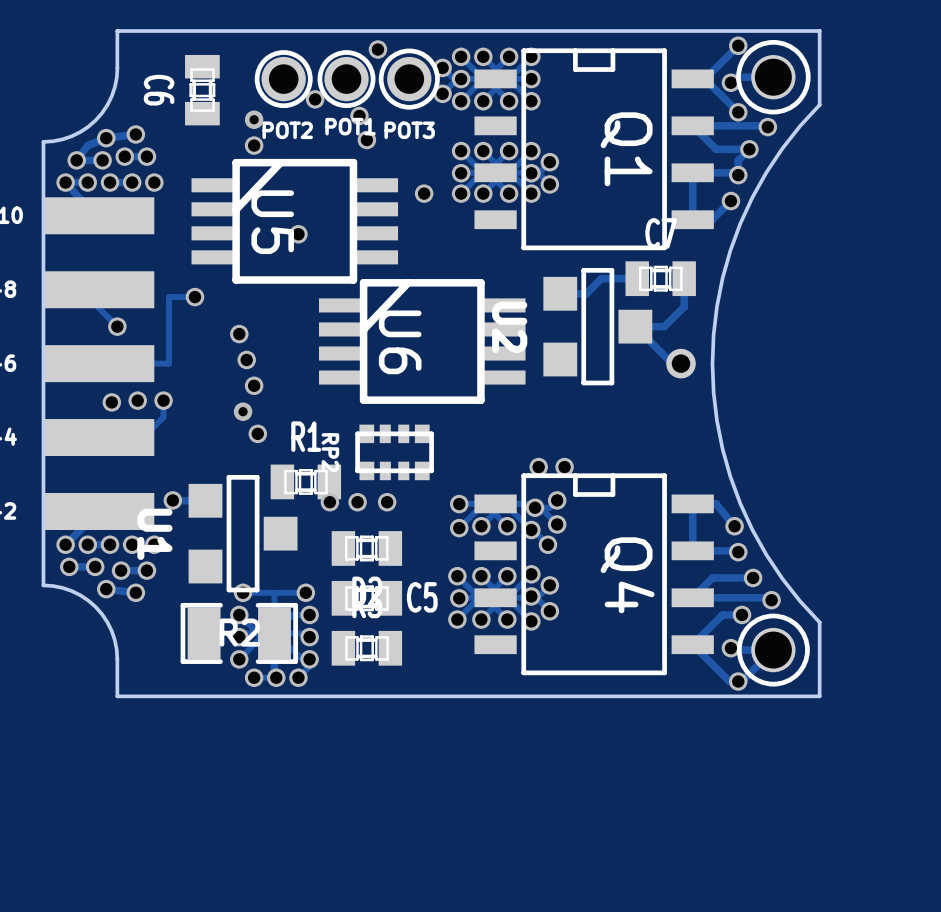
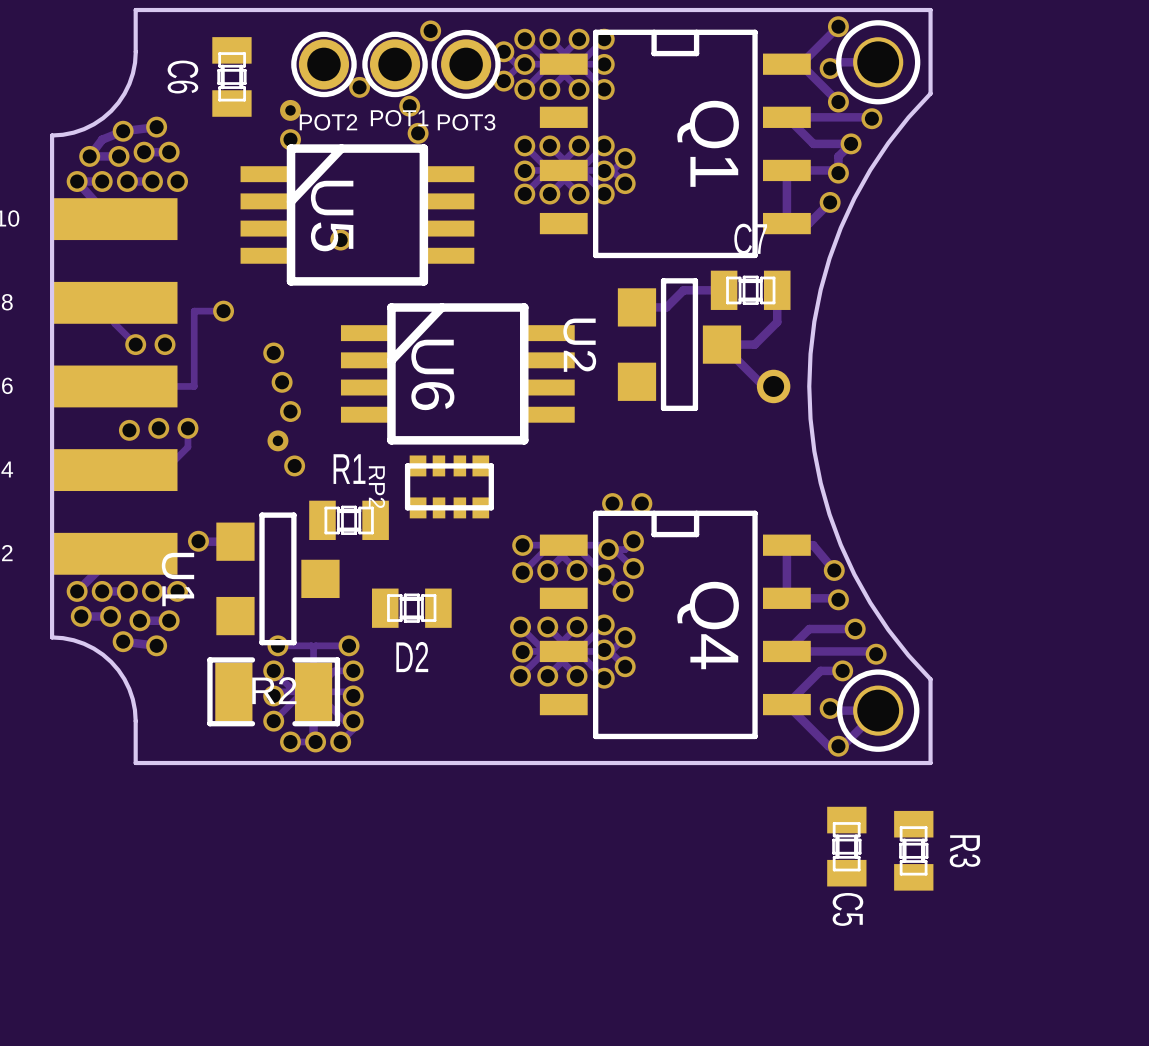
via: (424, 193) -> none
U5 position: (294, 221) -> (357, 214)
via: none -> (165, 344)
U6 position: (422, 341) -> (457, 373)
via: (329, 502) -> none
via: (357, 502) -> none
via: (387, 502) -> none
D2 position: (366, 548) -> (411, 608)
C5 rotation: 0° (366, 598) -> 90° clockwise (846, 846)
C5 position: (366, 598) -> (846, 846)
R3 rotation: 0° (366, 648) -> 90° clockwise (913, 850)
R3 position: (366, 648) -> (913, 850)

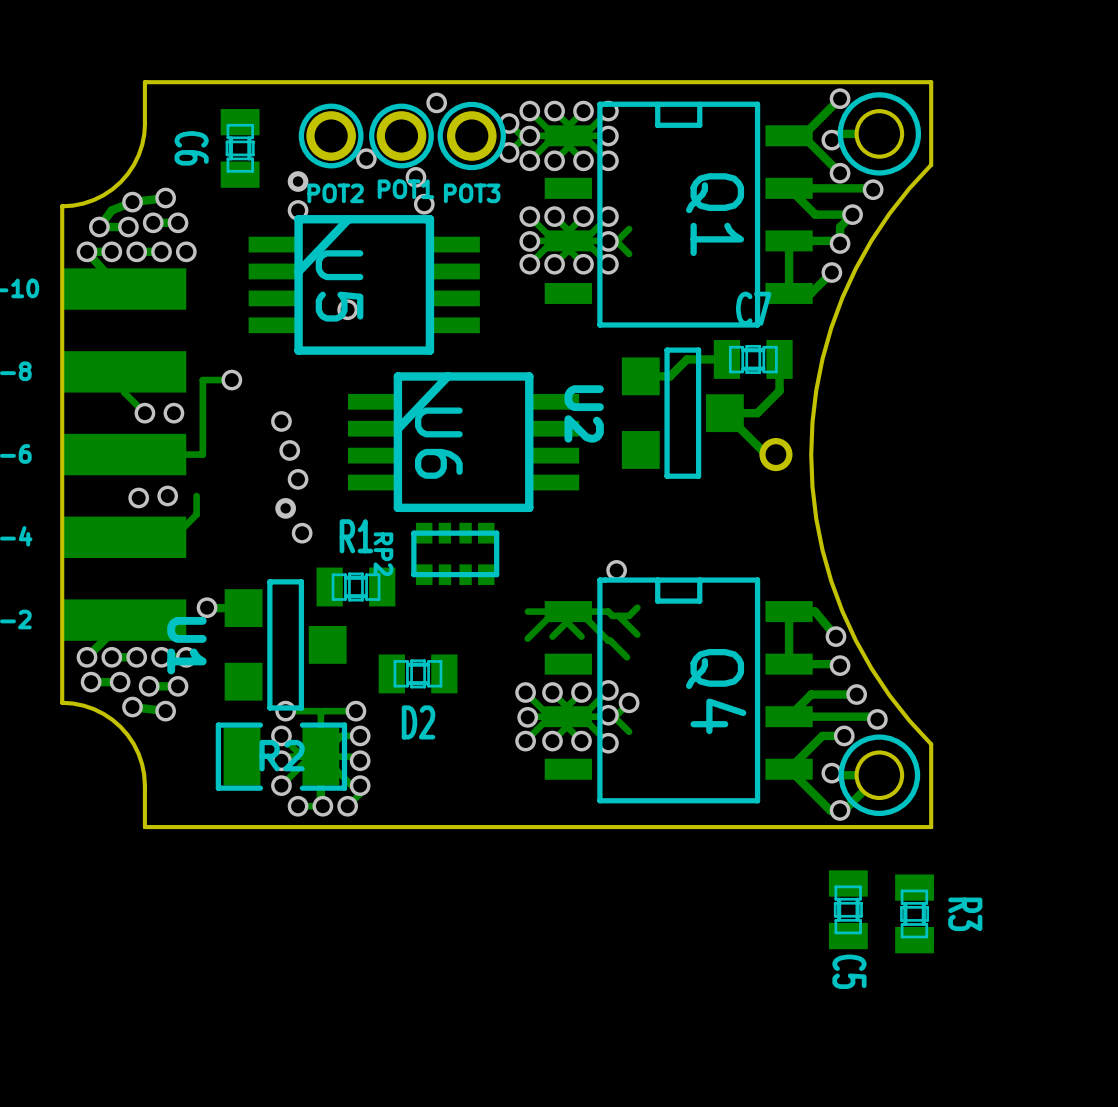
via: (625, 158) -> none
via: (625, 183) -> none
via: (187, 428) -> none
via: (641, 503) -> none
via: (633, 541) -> none
via: (522, 545) -> none
via: (608, 549) -> none
via: (633, 568) -> none
via: (547, 570) -> none
via: (577, 570) -> none
via: (522, 572) -> none
via: (604, 574) -> none
via: (623, 591) -> none
via: (625, 666) -> none

